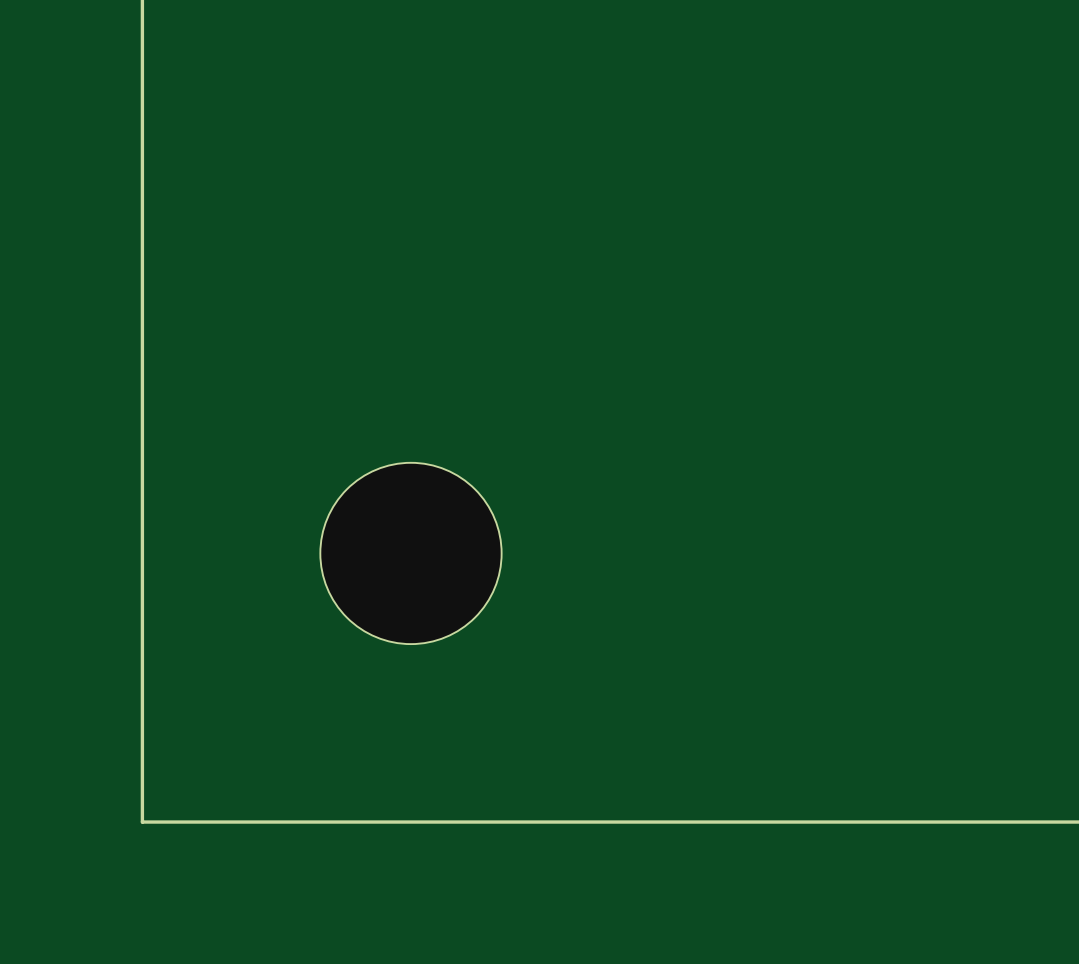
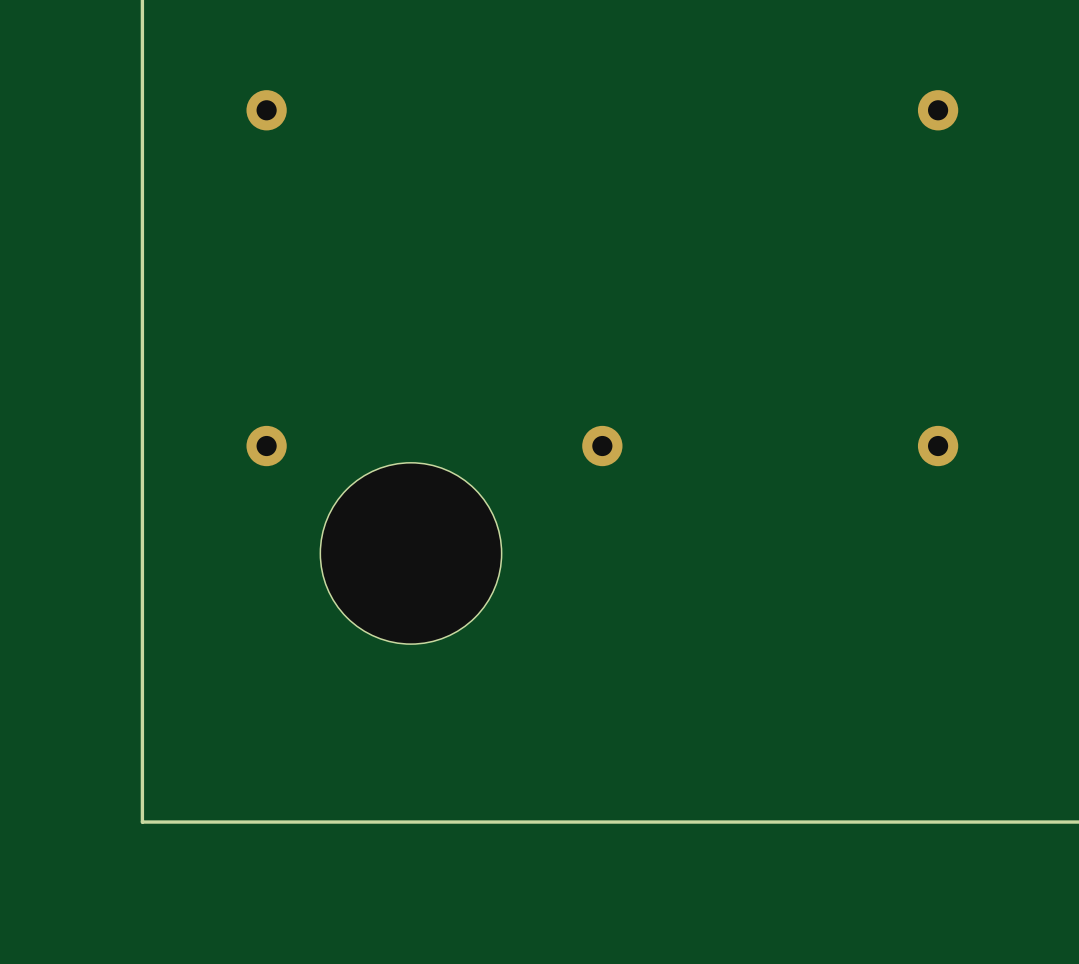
via: none -> (266, 110)
via: none -> (938, 110)
via: none -> (266, 446)
via: none -> (602, 446)
via: none -> (938, 446)

